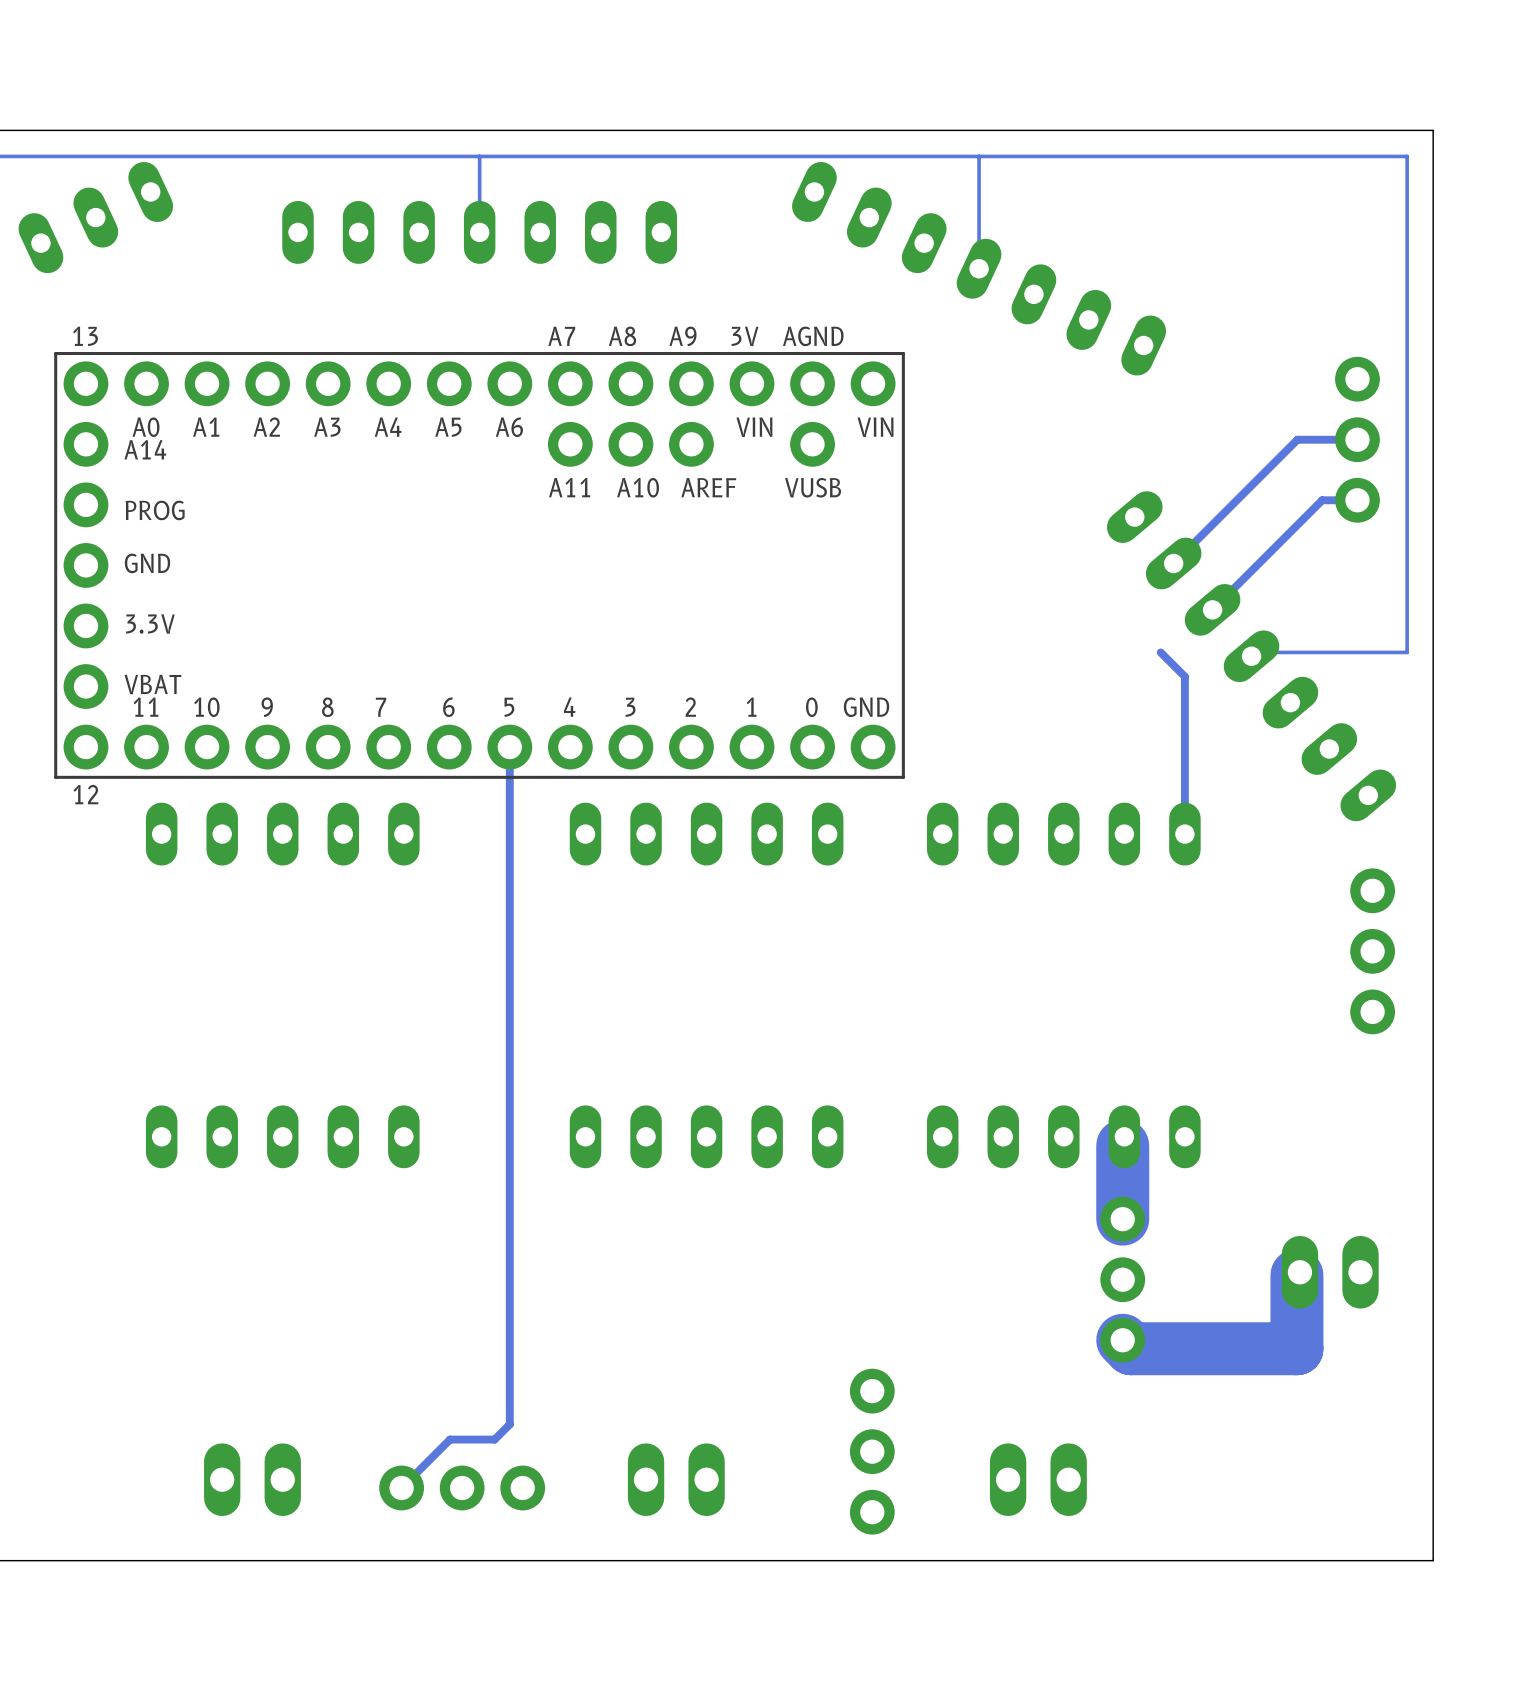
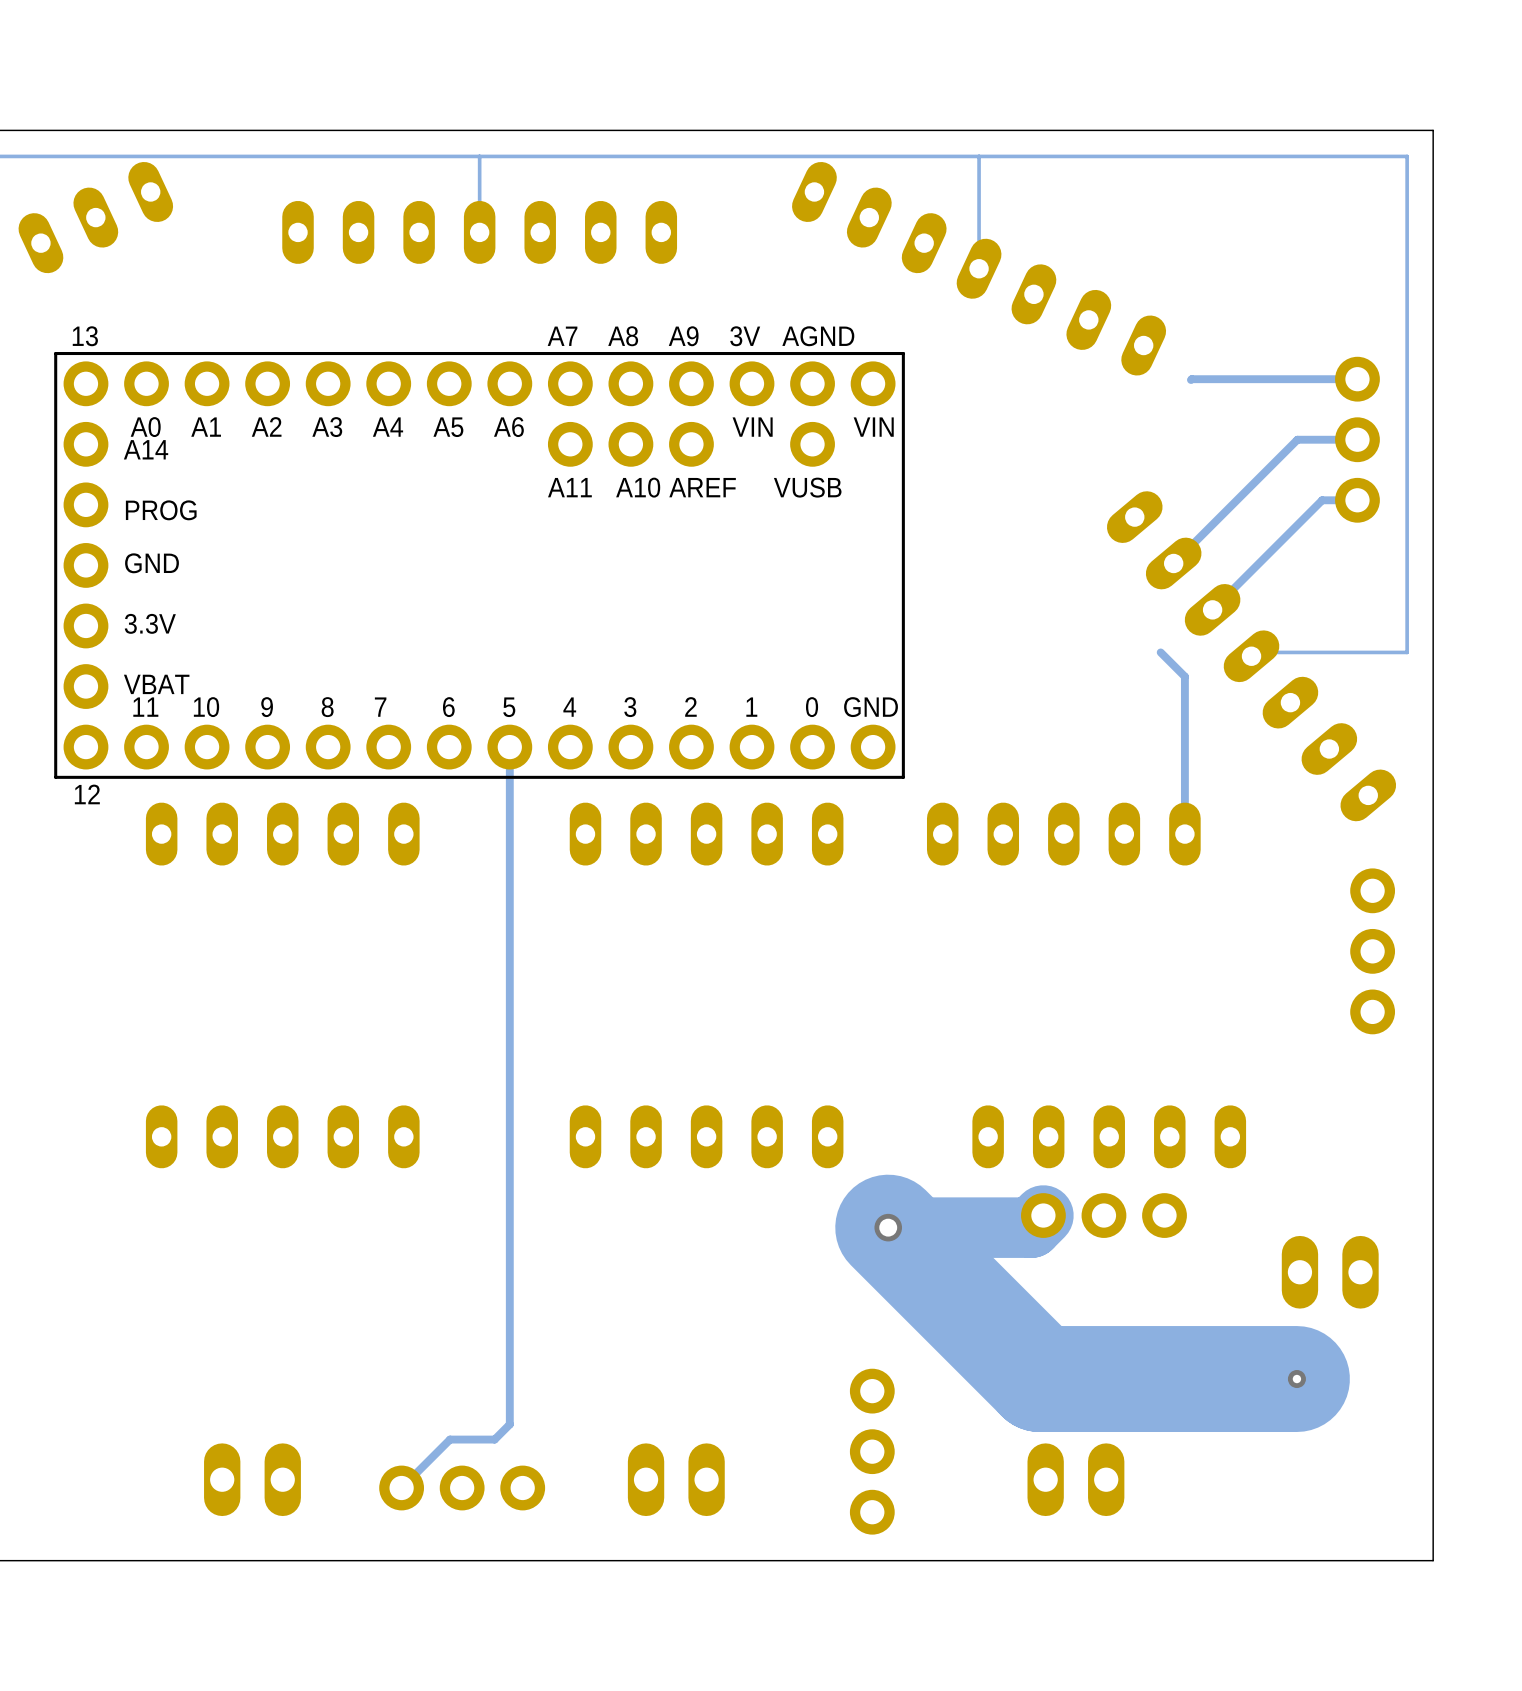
track: none -> (1357, 379) (1190, 379)
part position: (1063, 1136) -> (1109, 1136)
track: (1122, 1145) (1122, 1219) -> none
track: none -> (1043, 1215) (1031, 1227) (888, 1227) (1039, 1379) (1296, 1379)
via: none -> (888, 1227)
track: (1296, 1275) (1296, 1348) (1131, 1348) (1122, 1340) -> none
part rotation: 0° (1122, 1279) -> 90° clockwise (1103, 1215)
via: none -> (1296, 1379)
part position: (1038, 1479) -> (1075, 1479)

